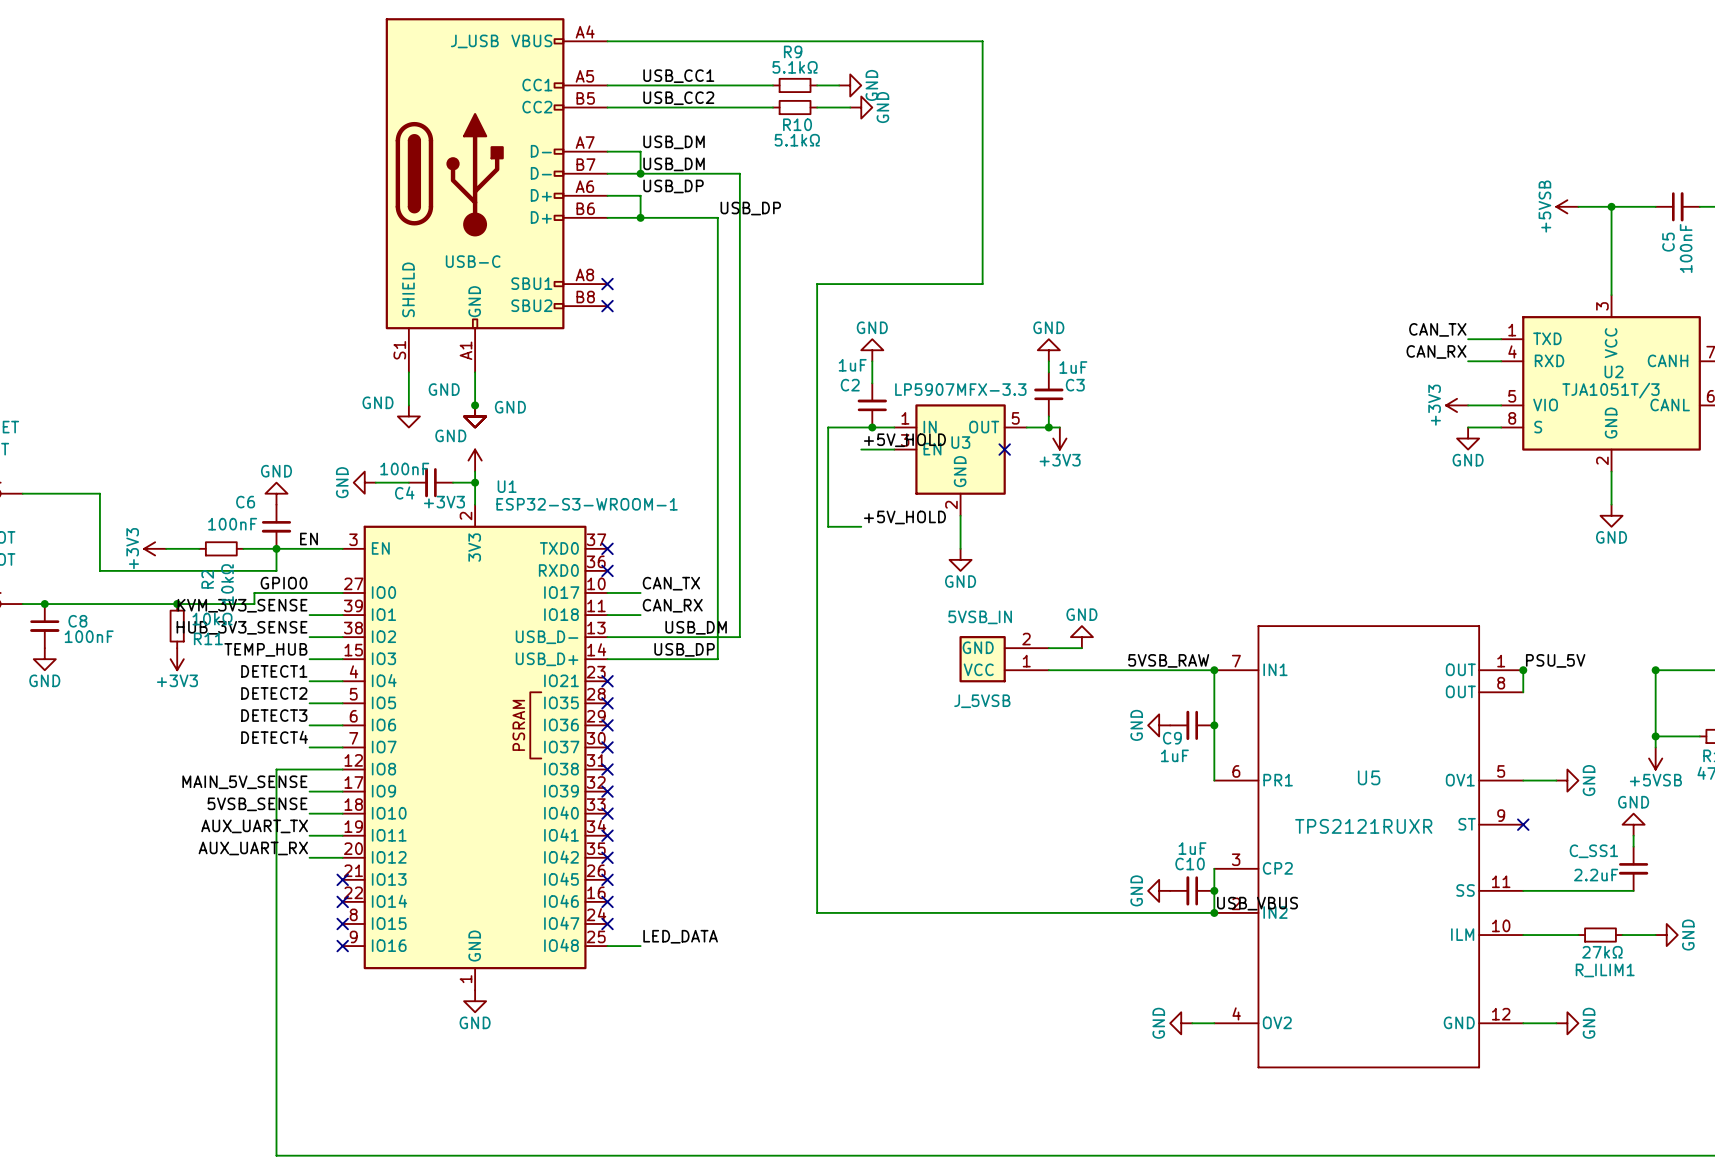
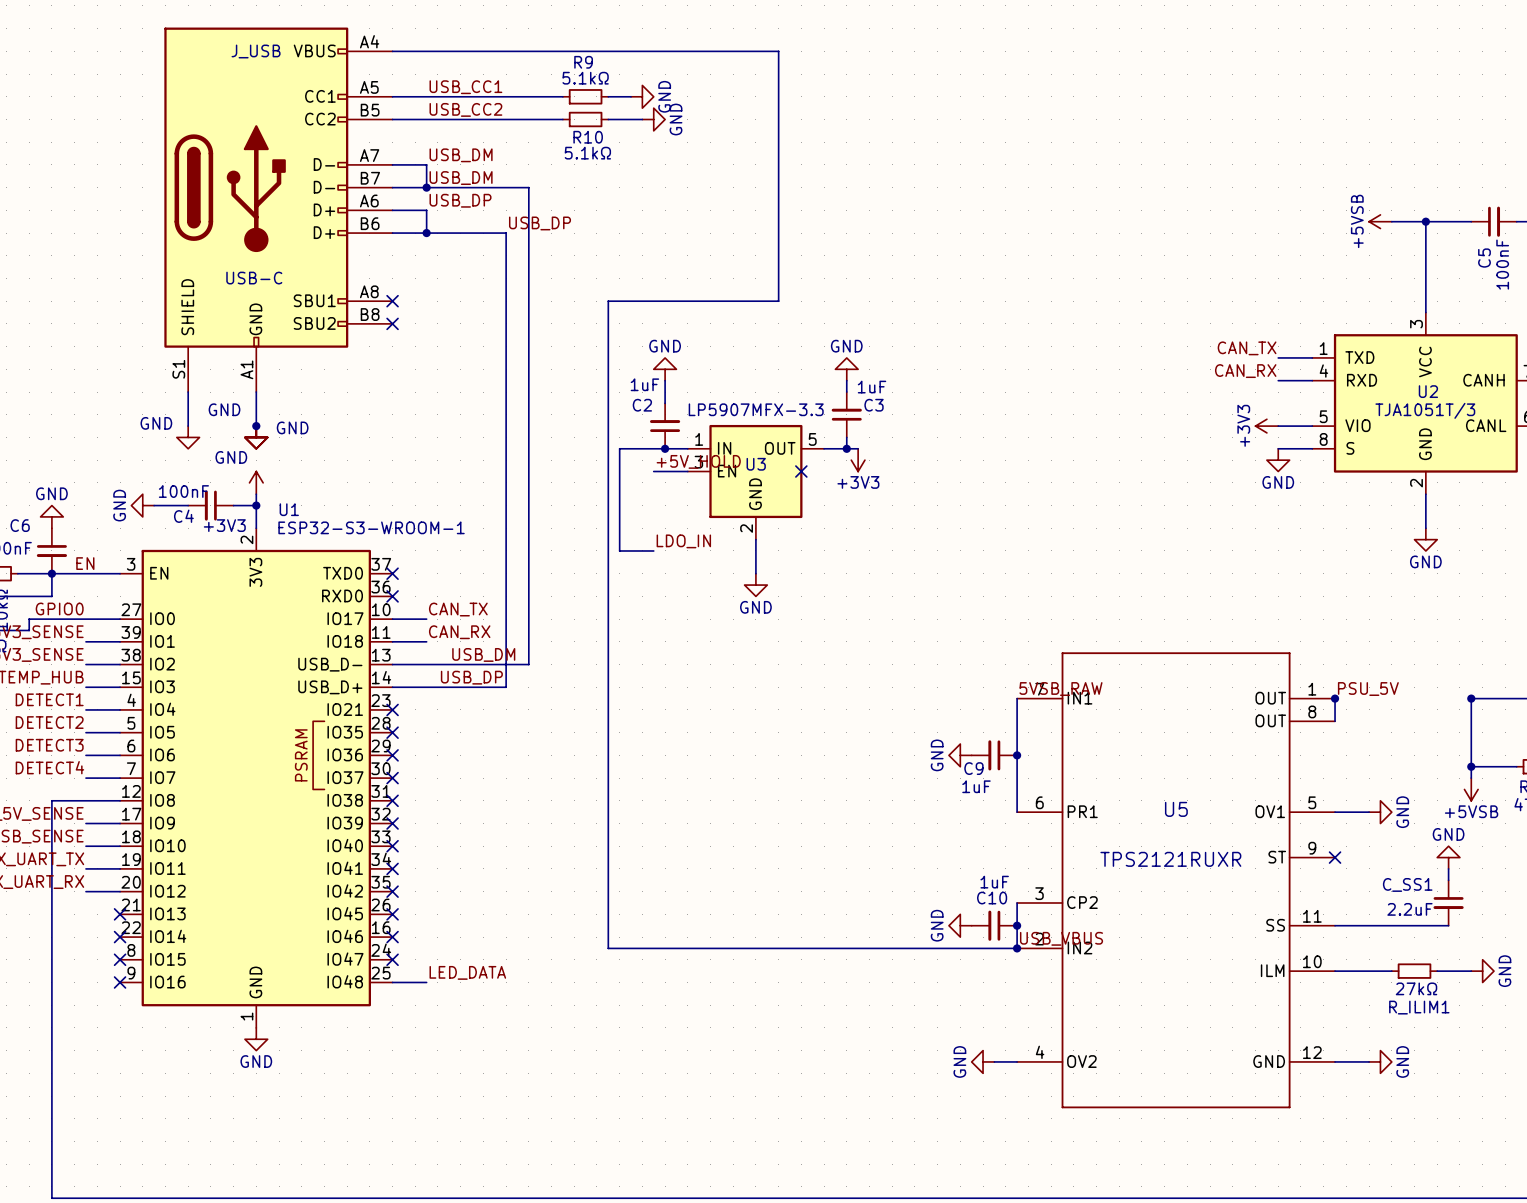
label: +5V_HOLD (904, 517) -> LDO_IN (683, 541)
power symbol: GND (1081, 637) -> none
wire: (1048, 648) (1081, 648) -> none
J_5VSB: 5VSB_IN (1004, 659) -> none
label position: 5VSB_RAW (1168, 660) -> 5VSB_RAW (1060, 689)
wire: (1048, 670) (1214, 670) -> none
junction: (1214, 670) -> none

